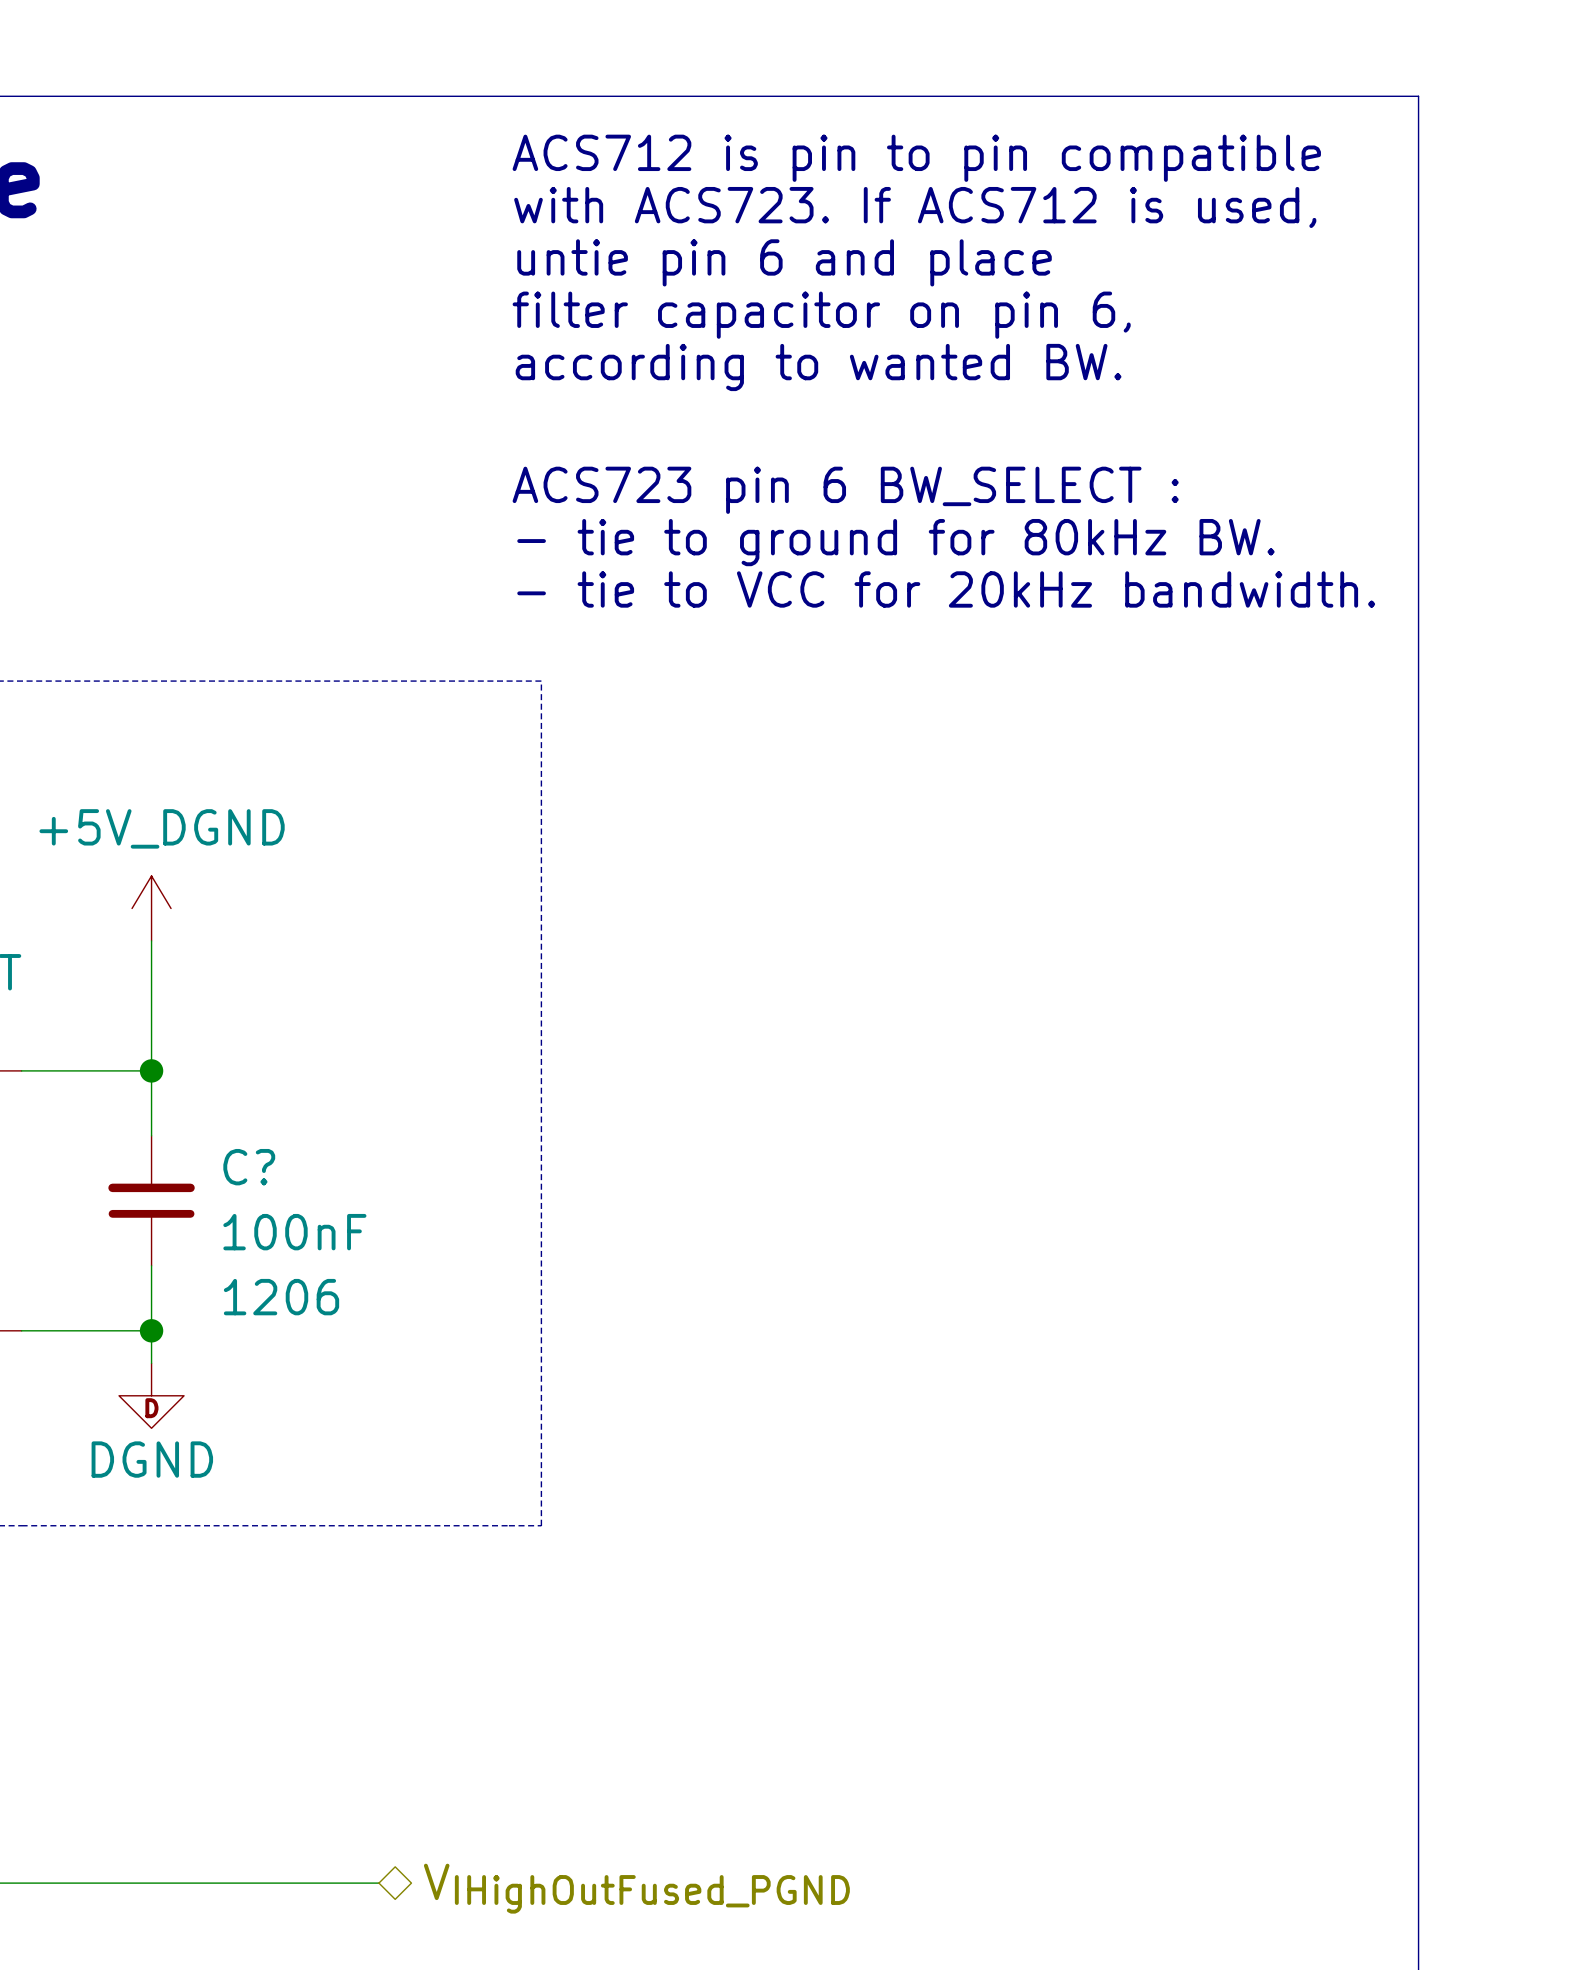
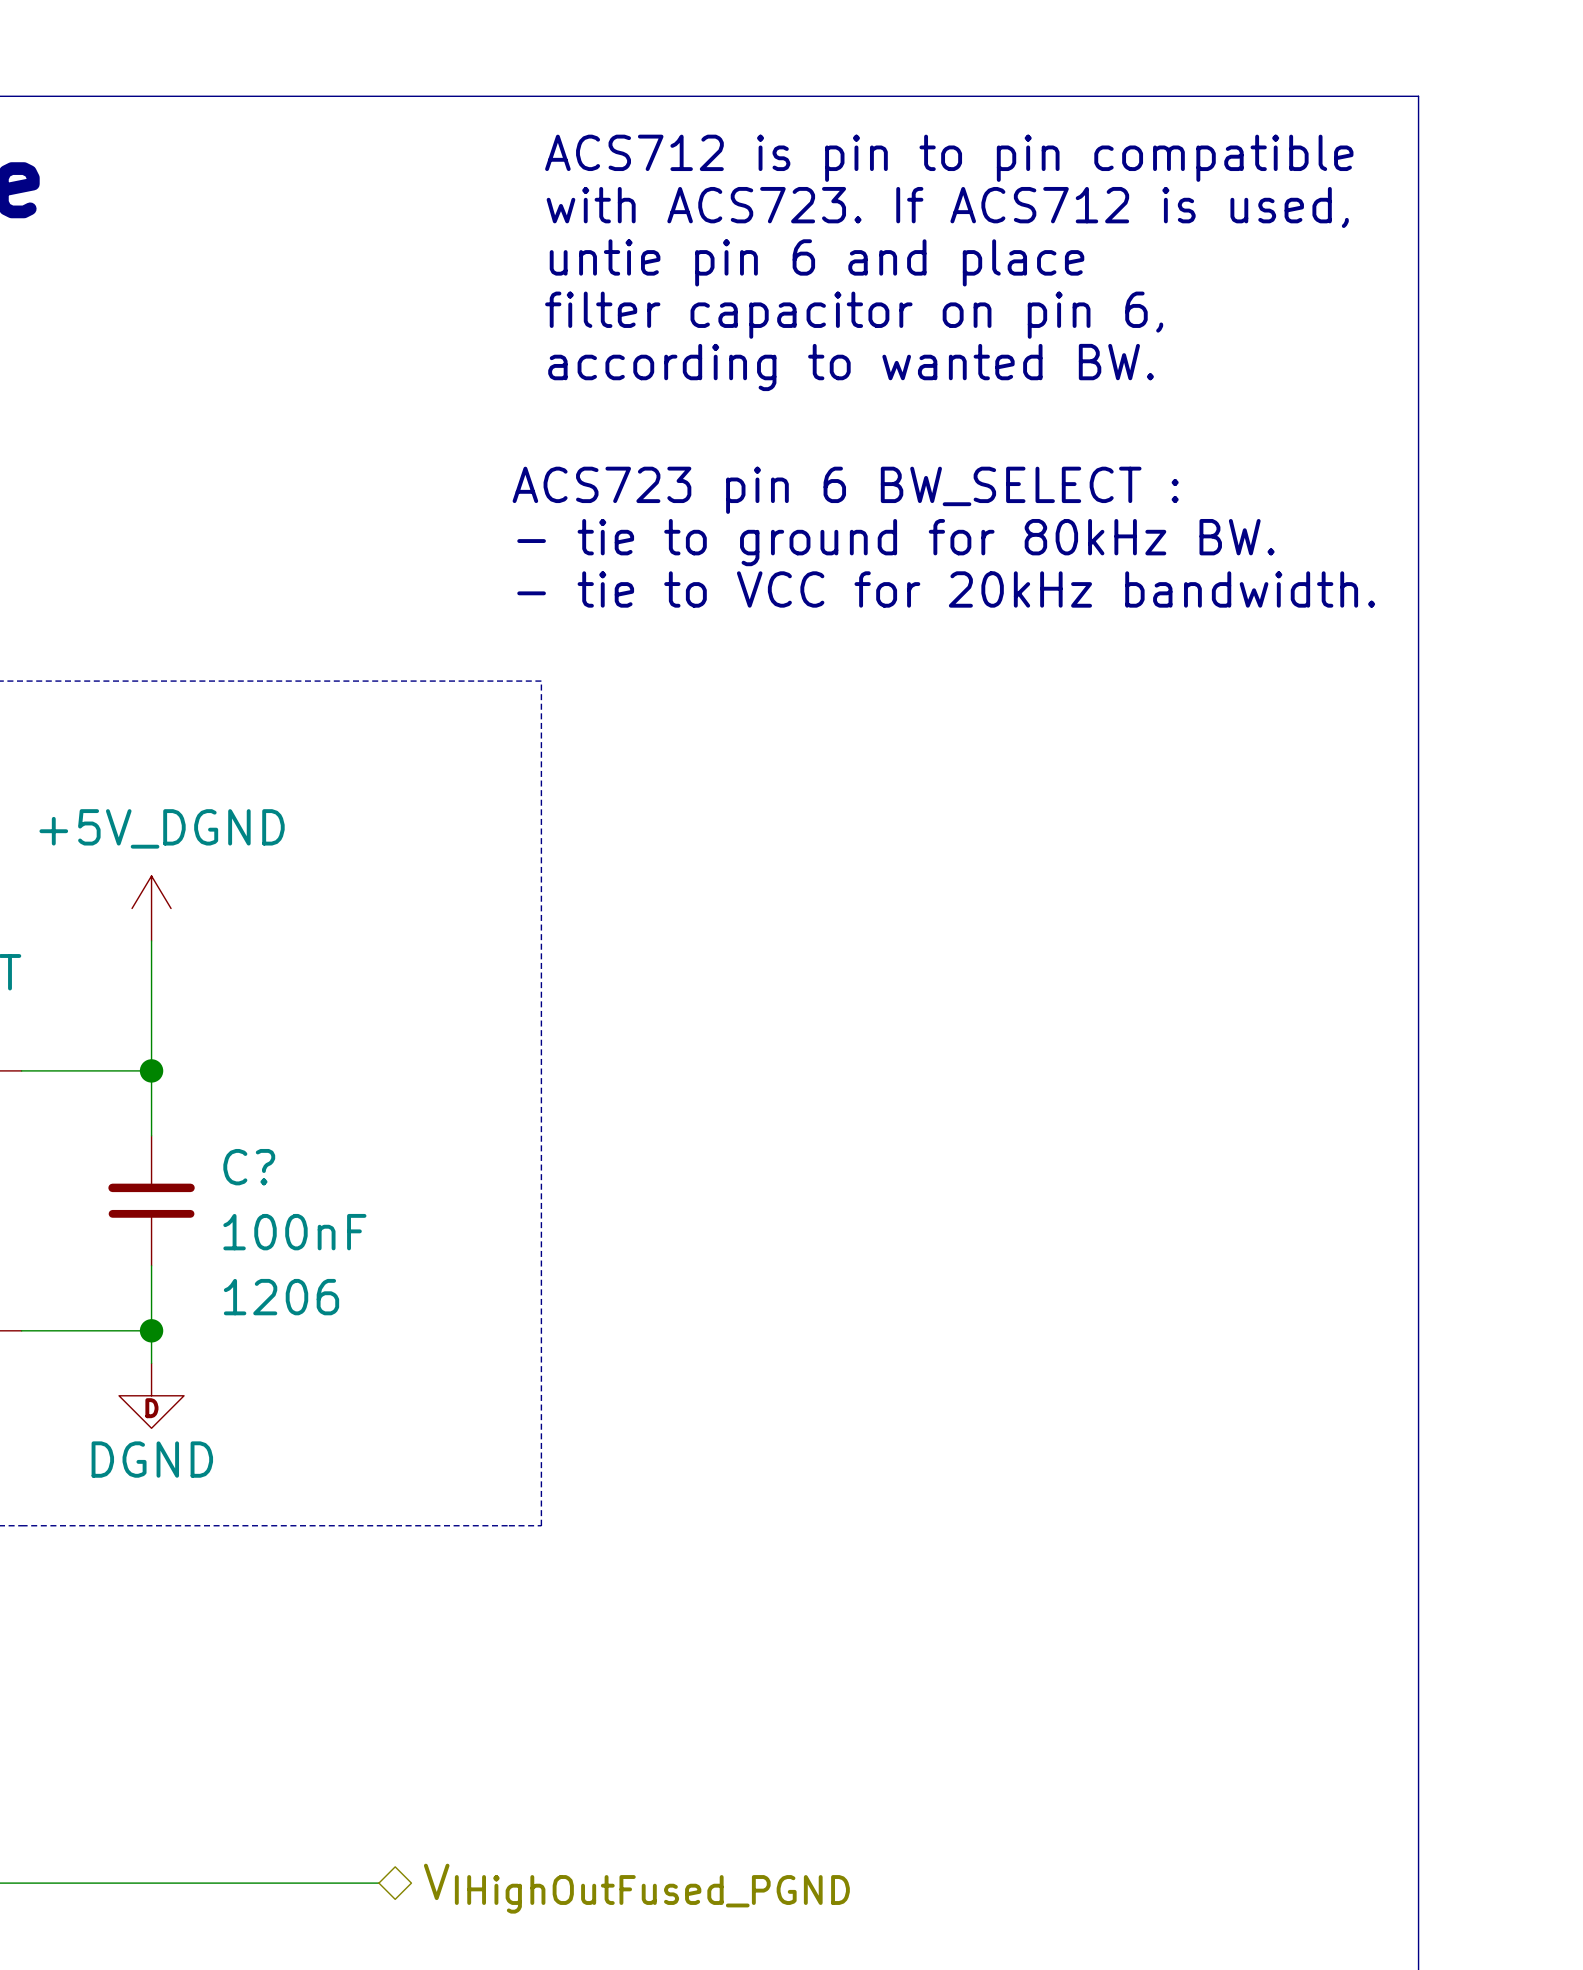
text position: ACS712 is pin to pin compatible (916, 158) -> ACS712 is pin to pin compatible (949, 158)
text position: with ACS723. If ACS712 is used, (915, 207) -> with ACS723. If ACS712 is used, (947, 207)
text position: untie pin 6 and place (784, 262) -> untie pin 6 and place (817, 262)
text position: filter capacitor on pin 6, (821, 315) -> filter capacitor on pin 6, (854, 315)
text position: according to wanted BW. (818, 367) -> according to wanted BW. (851, 367)

